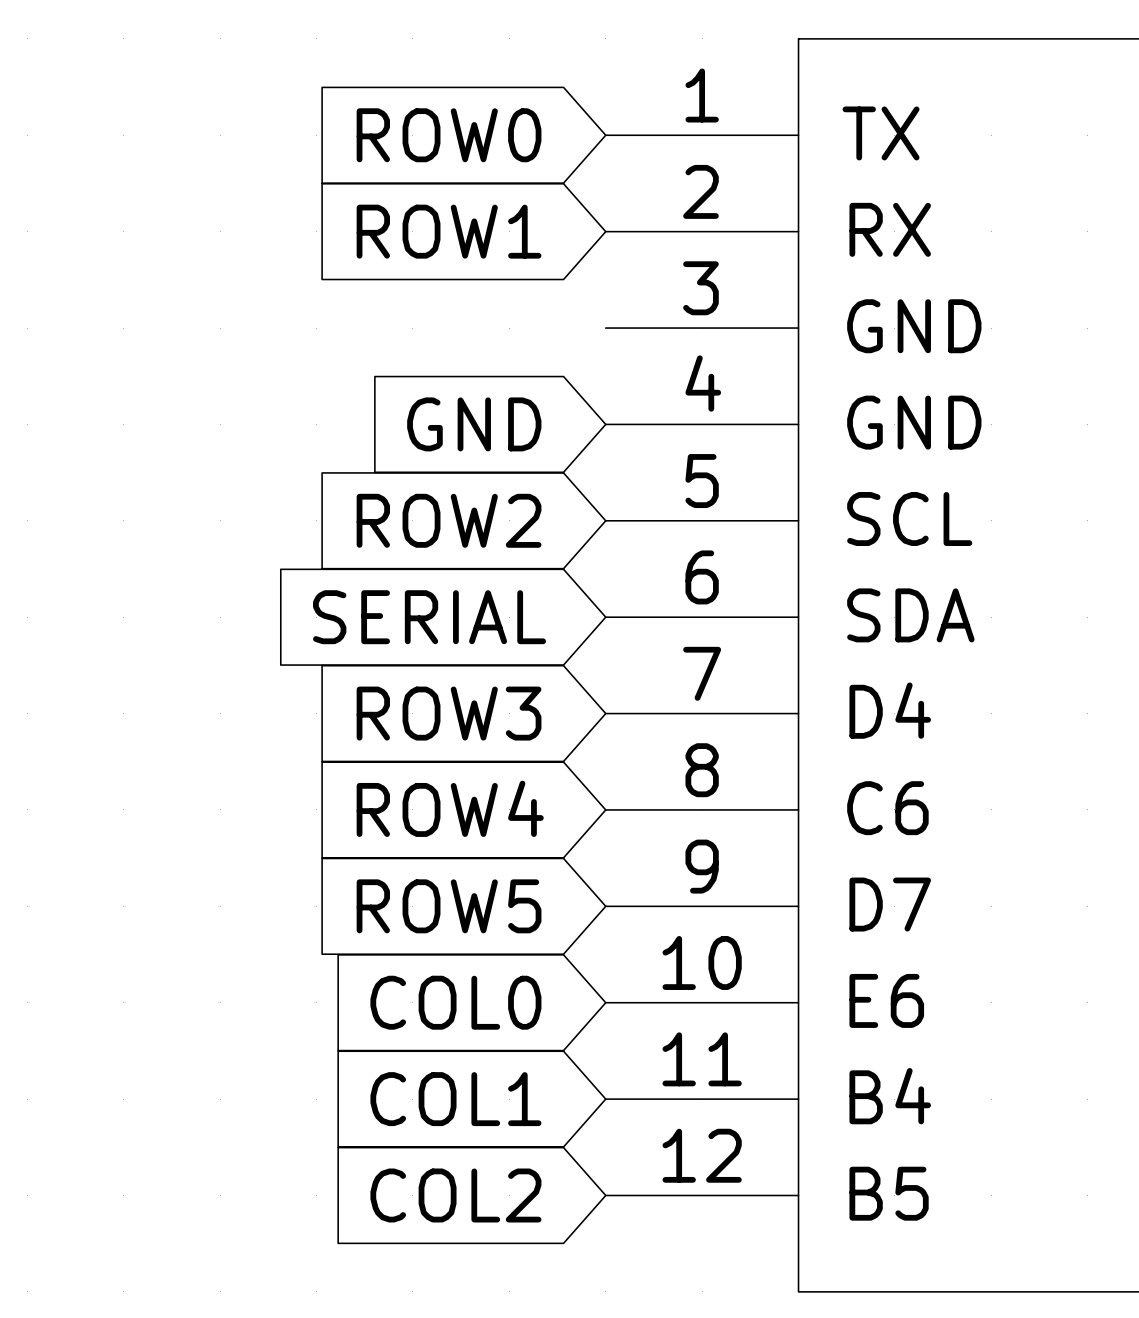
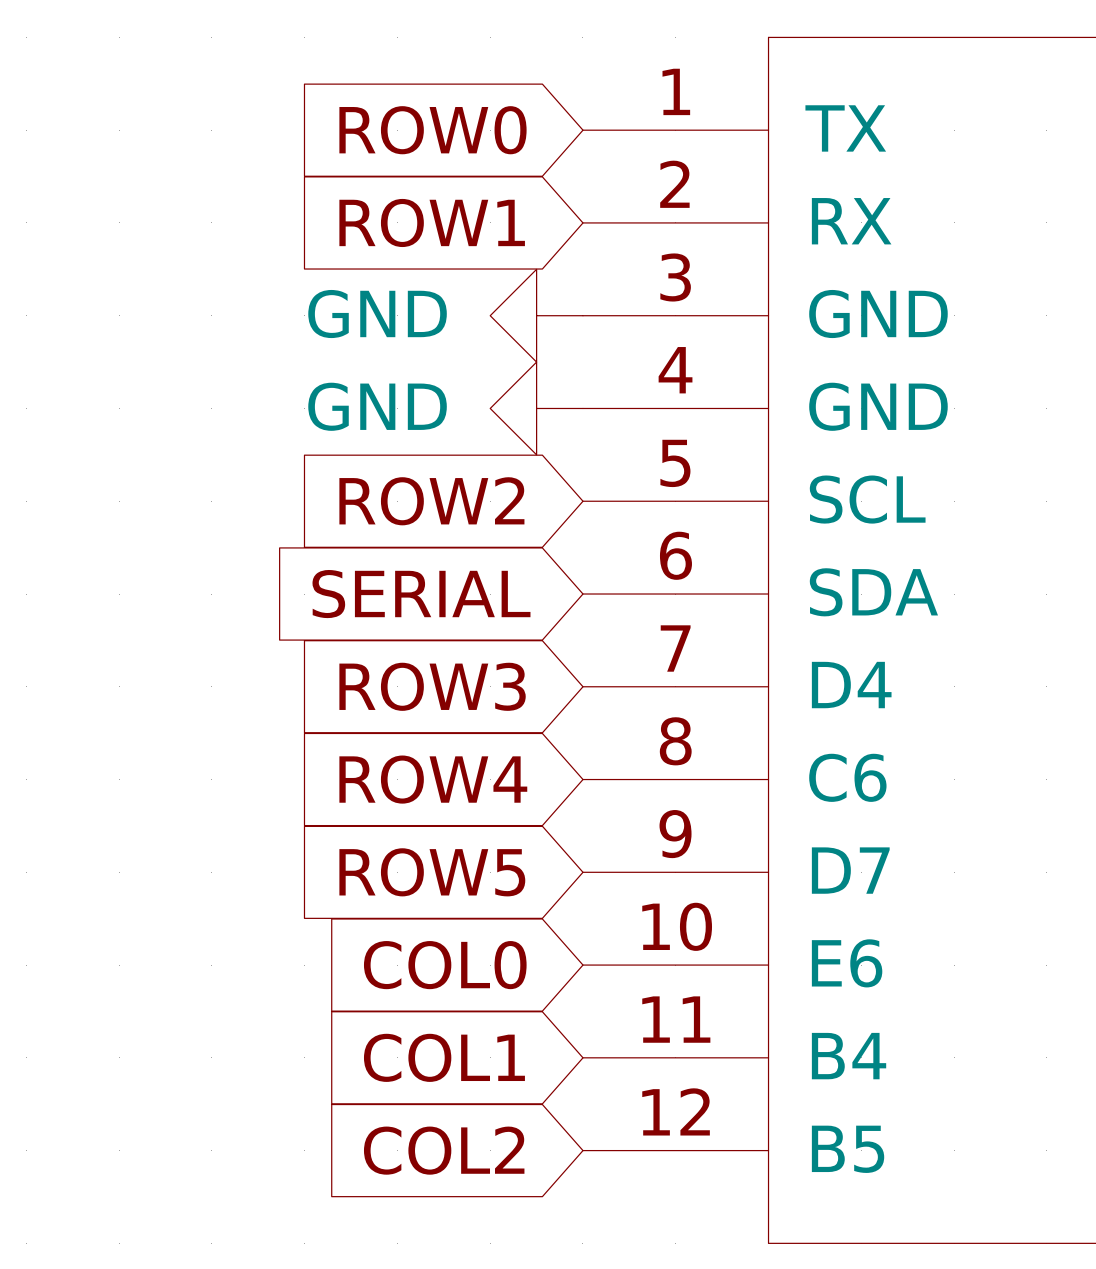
power symbol: none -> GND (536, 315)
global label: GND (474, 424) -> none
power symbol: none -> GND (536, 408)

